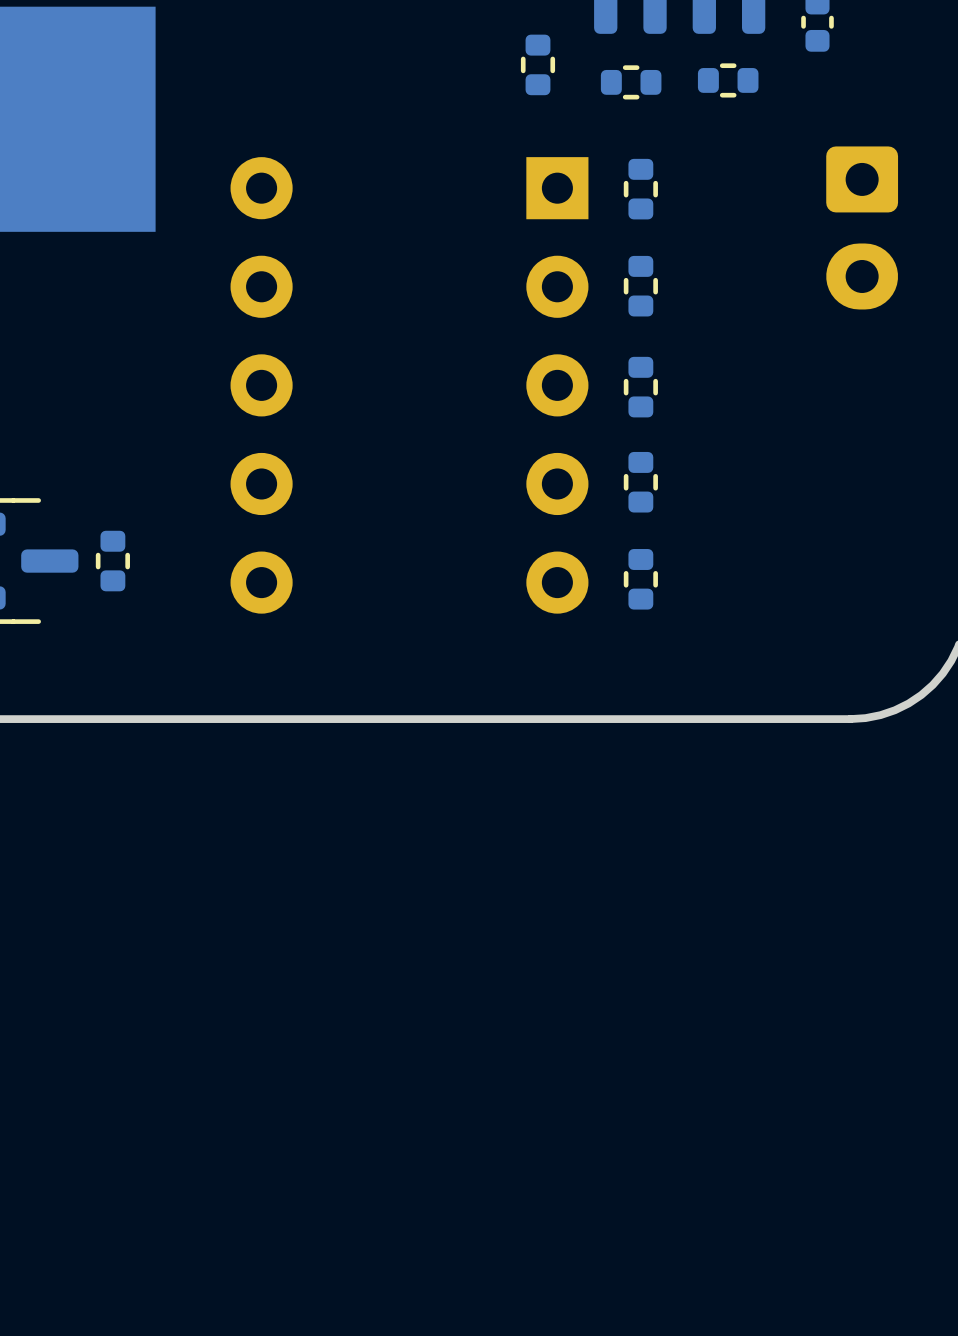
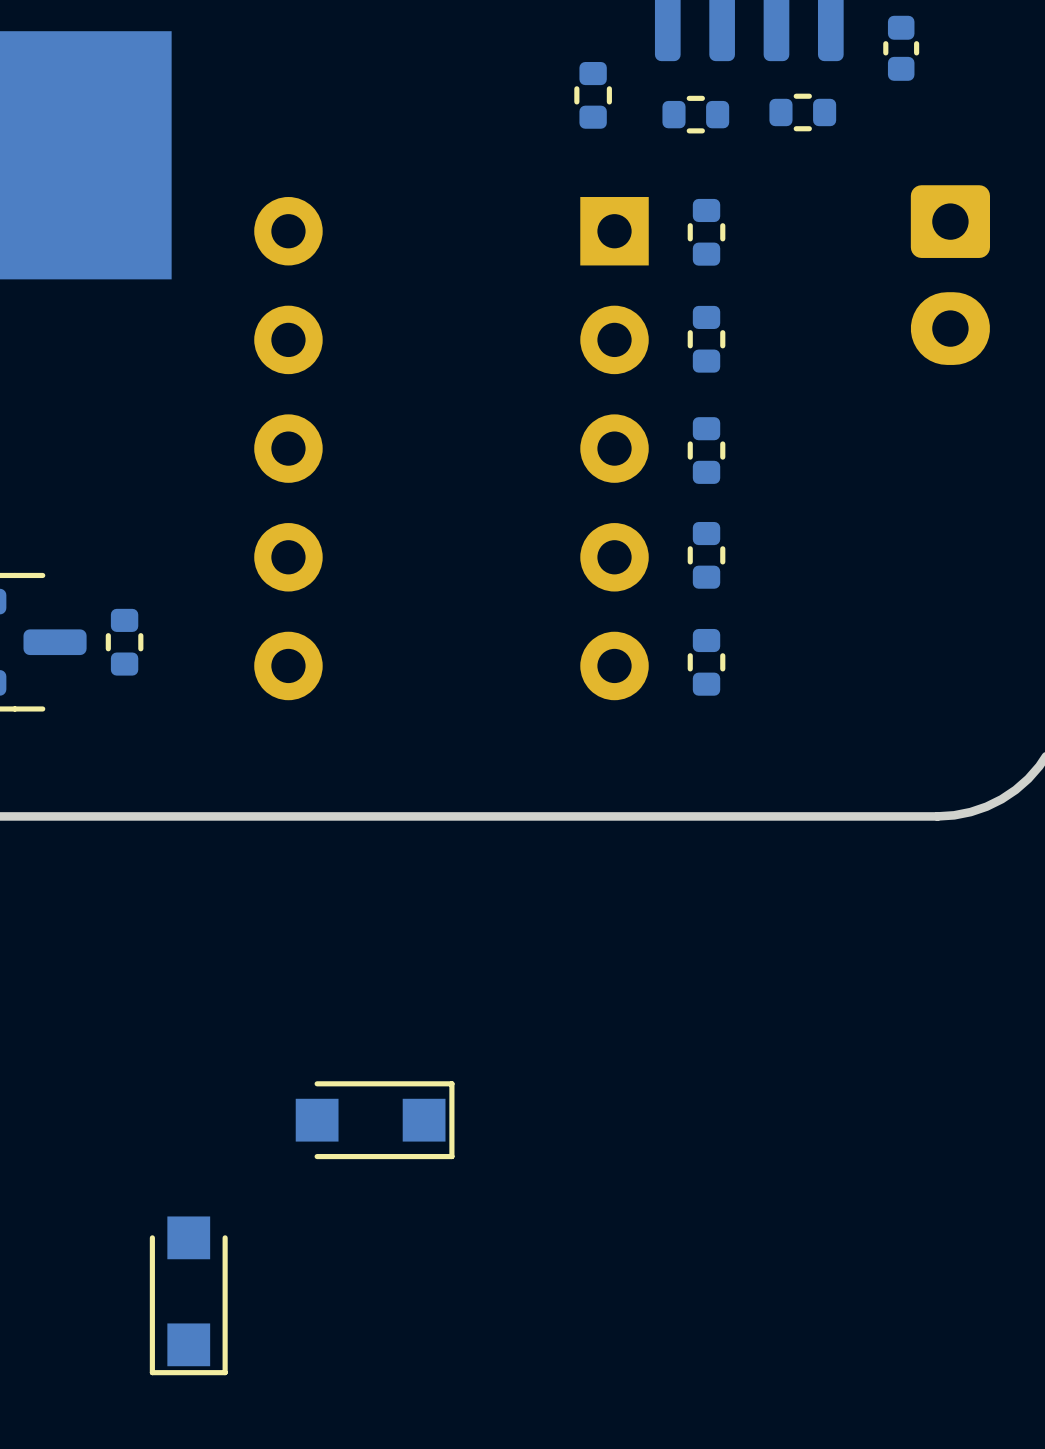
part: none -> (375, 1120)
part: none -> (188, 1295)

